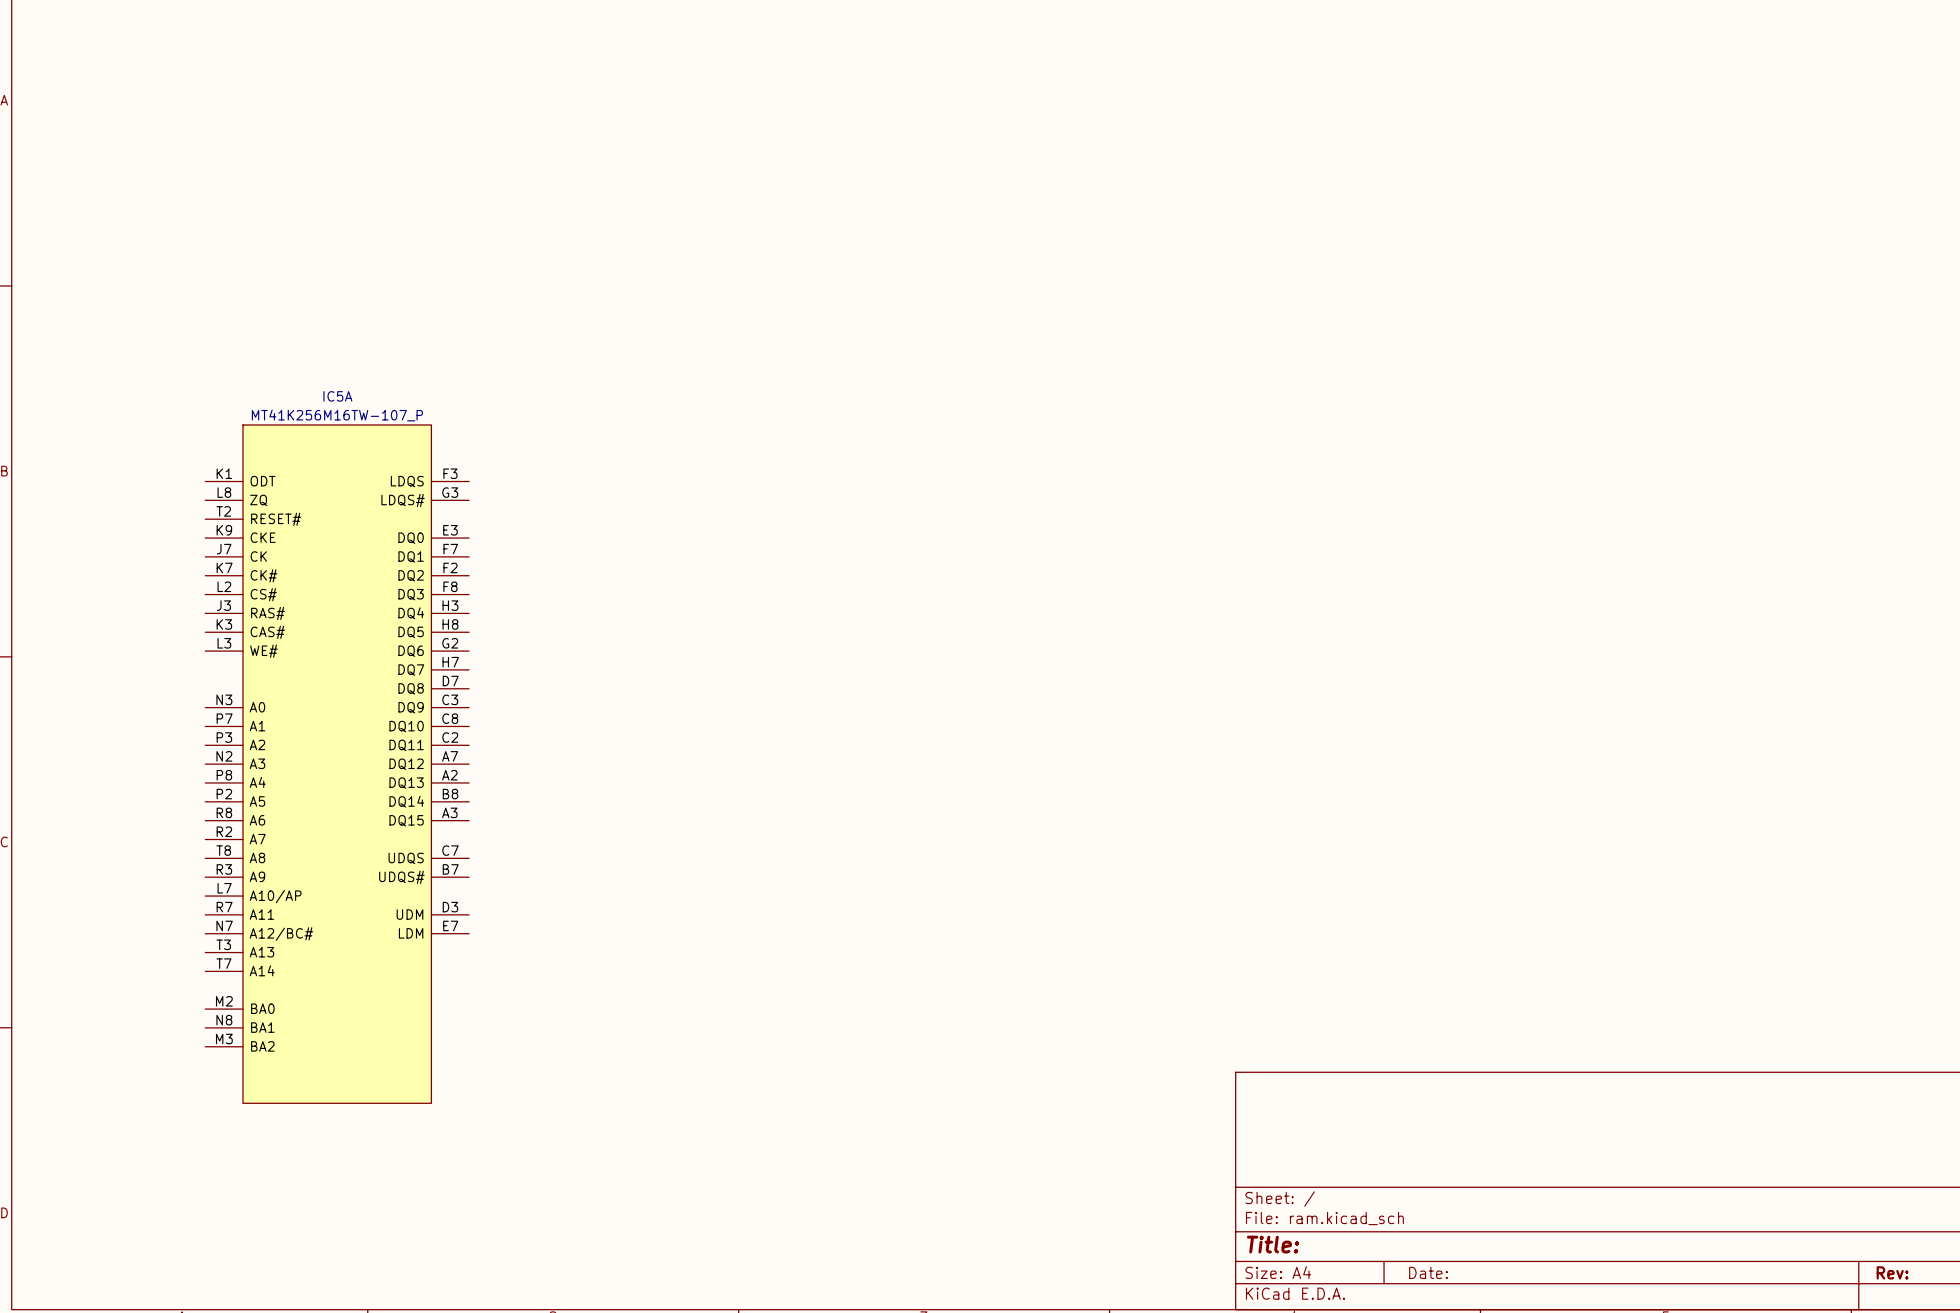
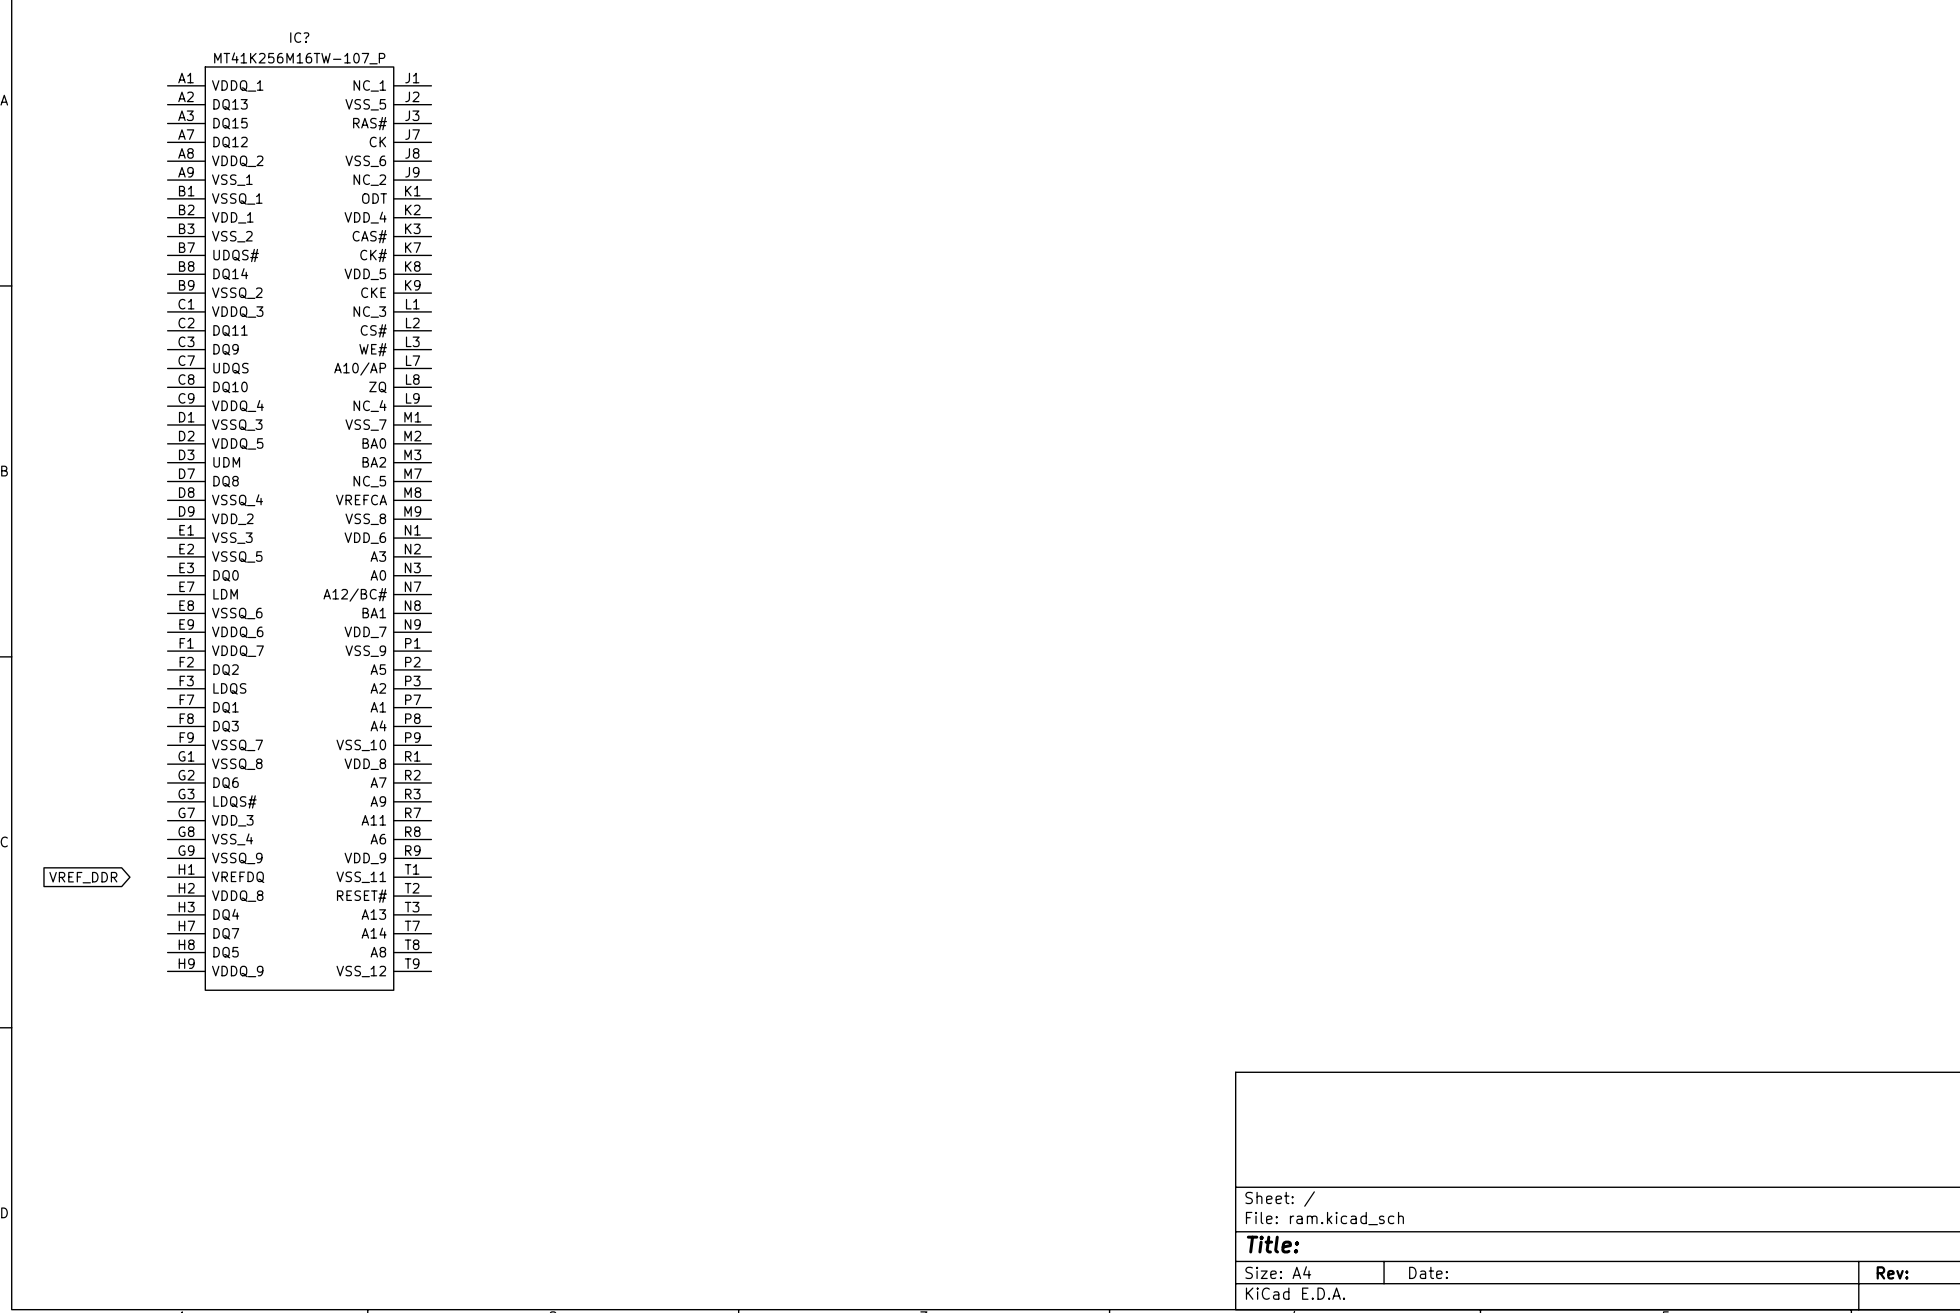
IC?: none -> MT41K256M16TW-107_P (299, 528)
IC5A: MT41K256M16TW-107_P (337, 764) -> none
global label: none -> VREF_DDR (83, 877)

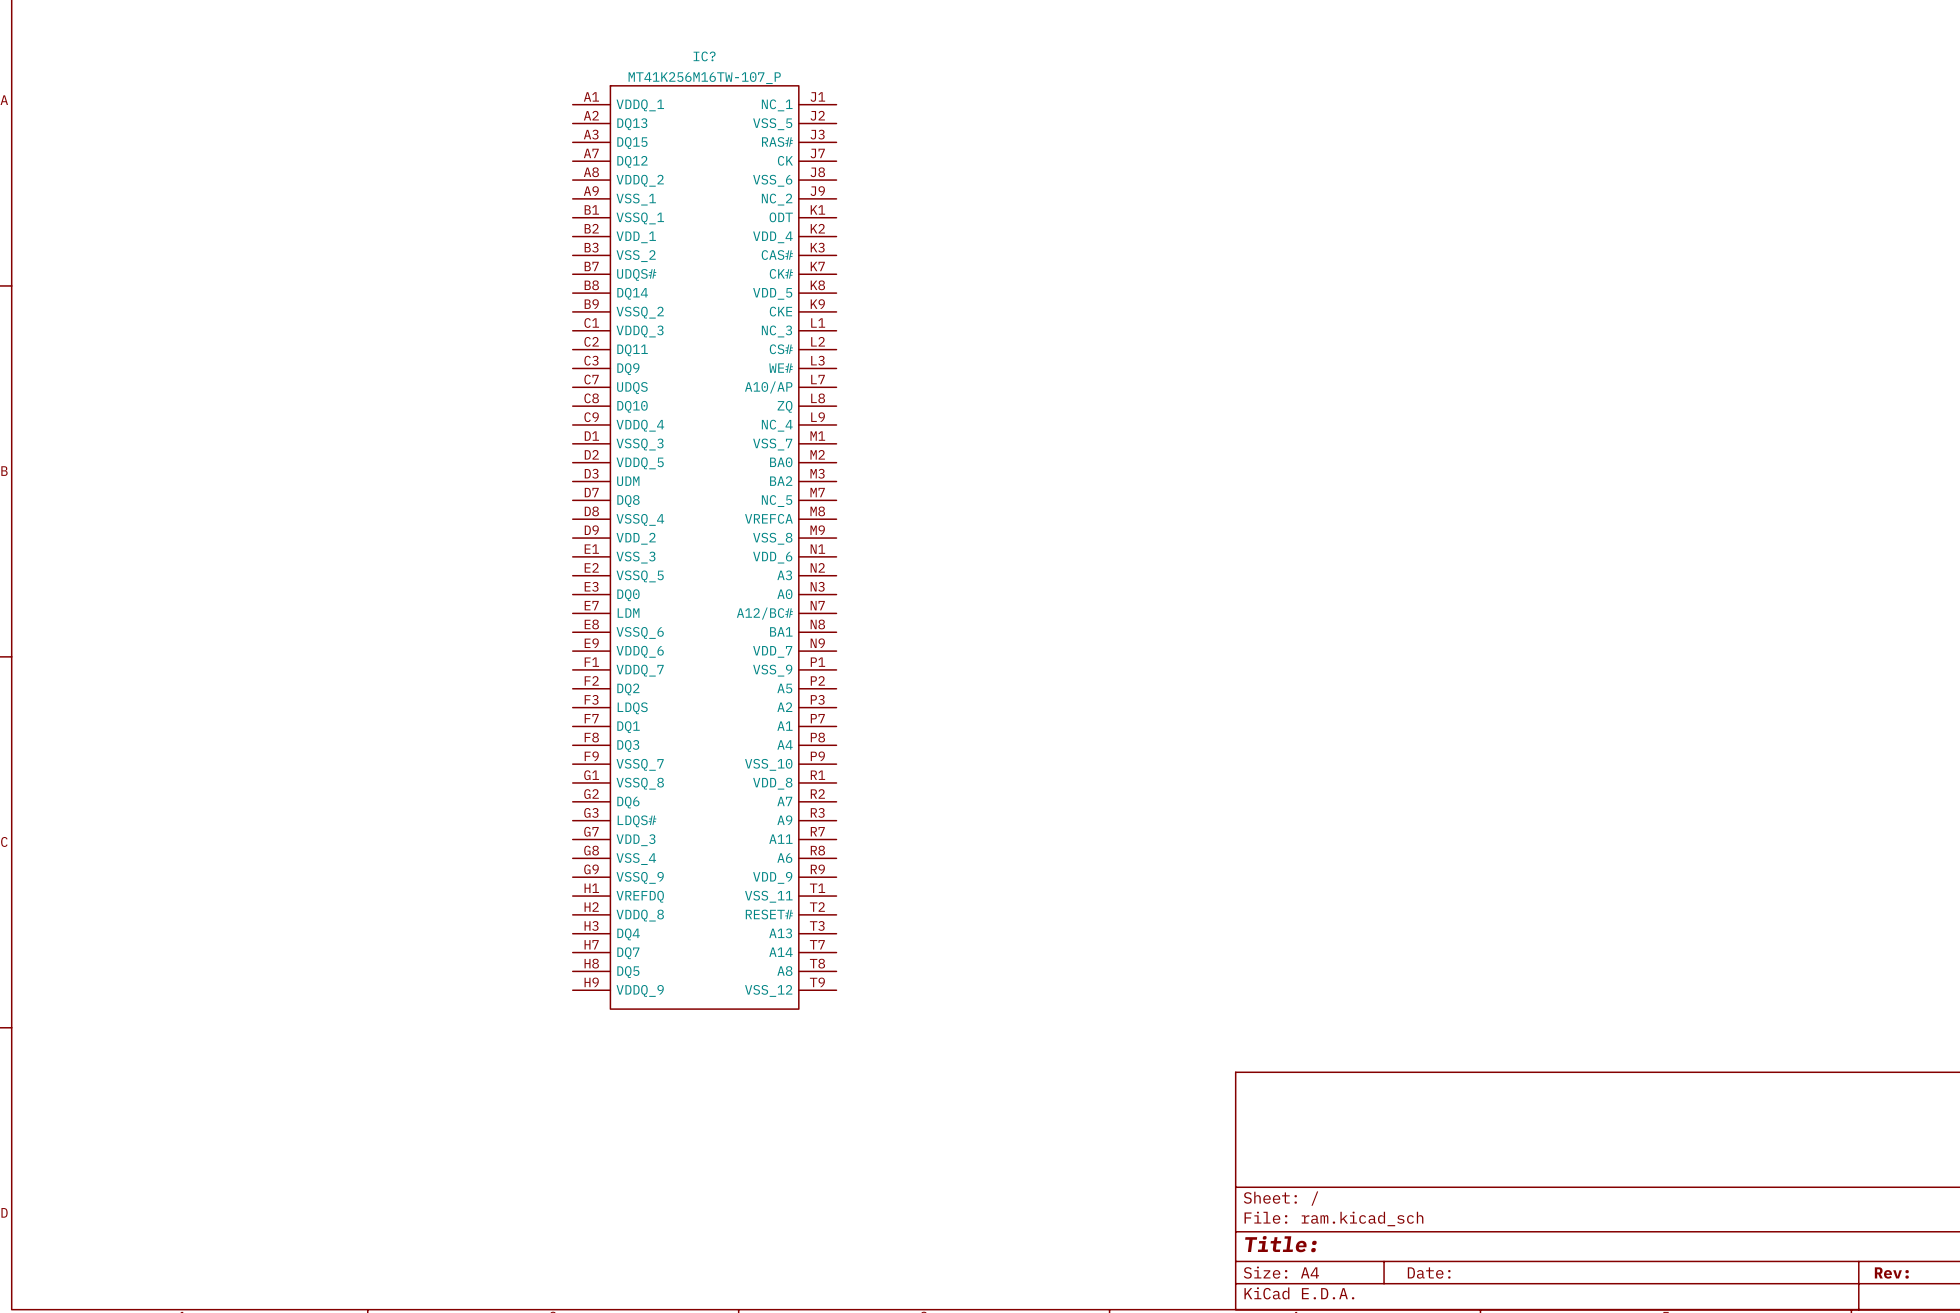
IC?: MT41K256M16TW-107_P (299, 528) -> none
IC?: none -> MT41K256M16TW-107_P (704, 547)
global label: VREF_DDR (83, 877) -> none

